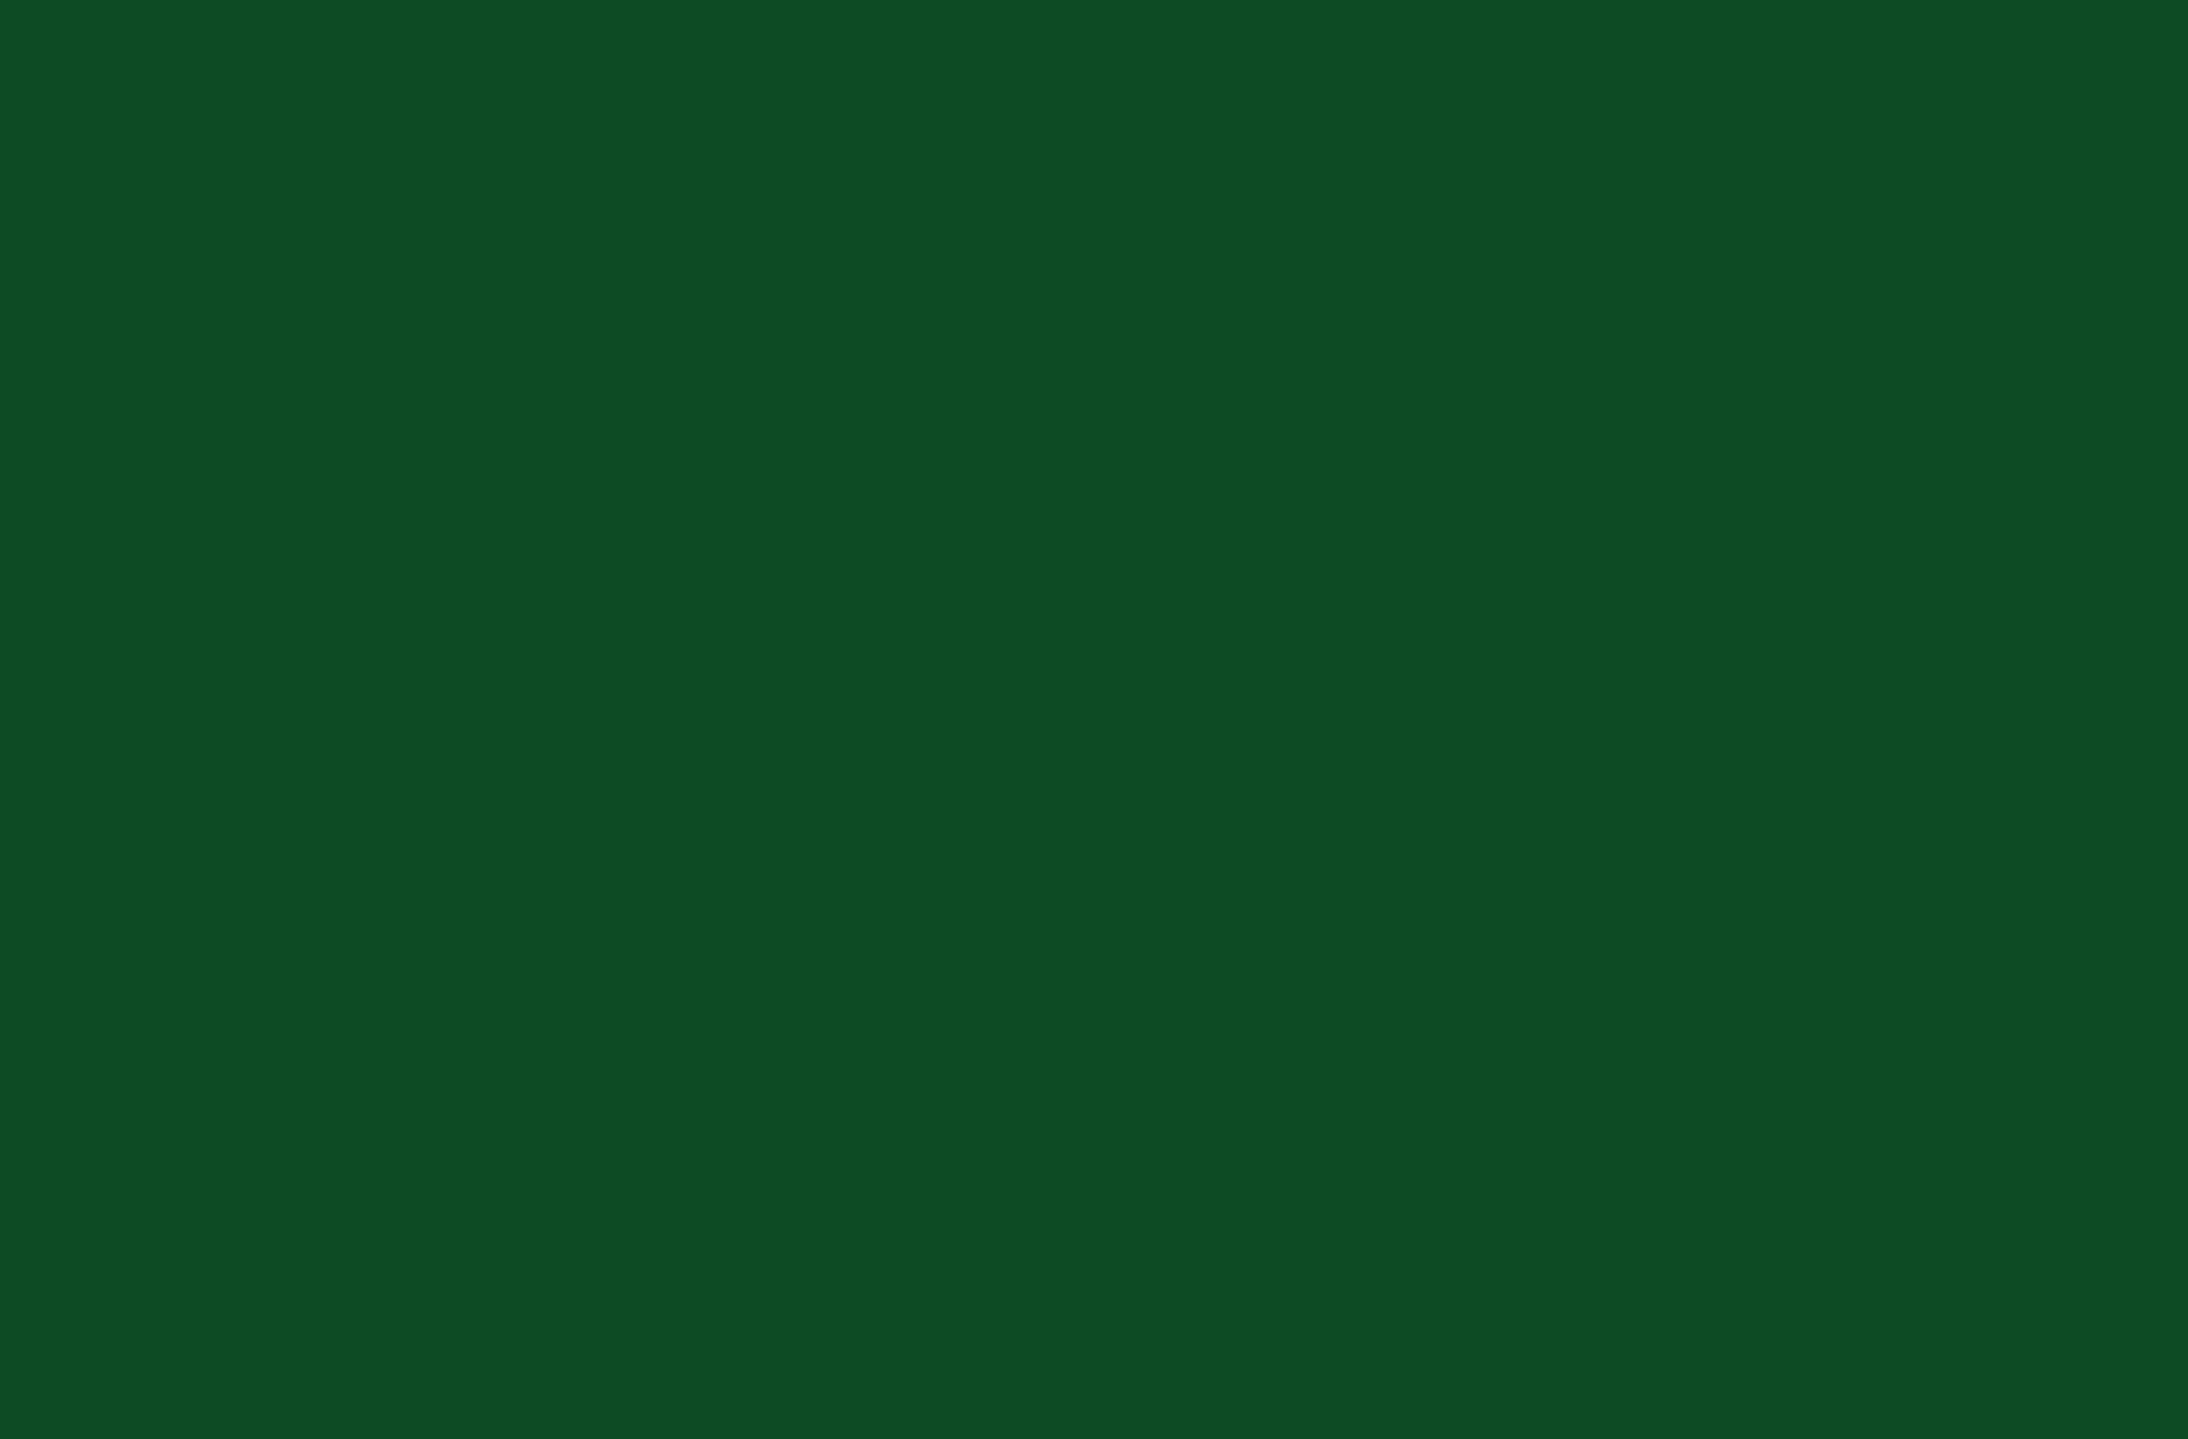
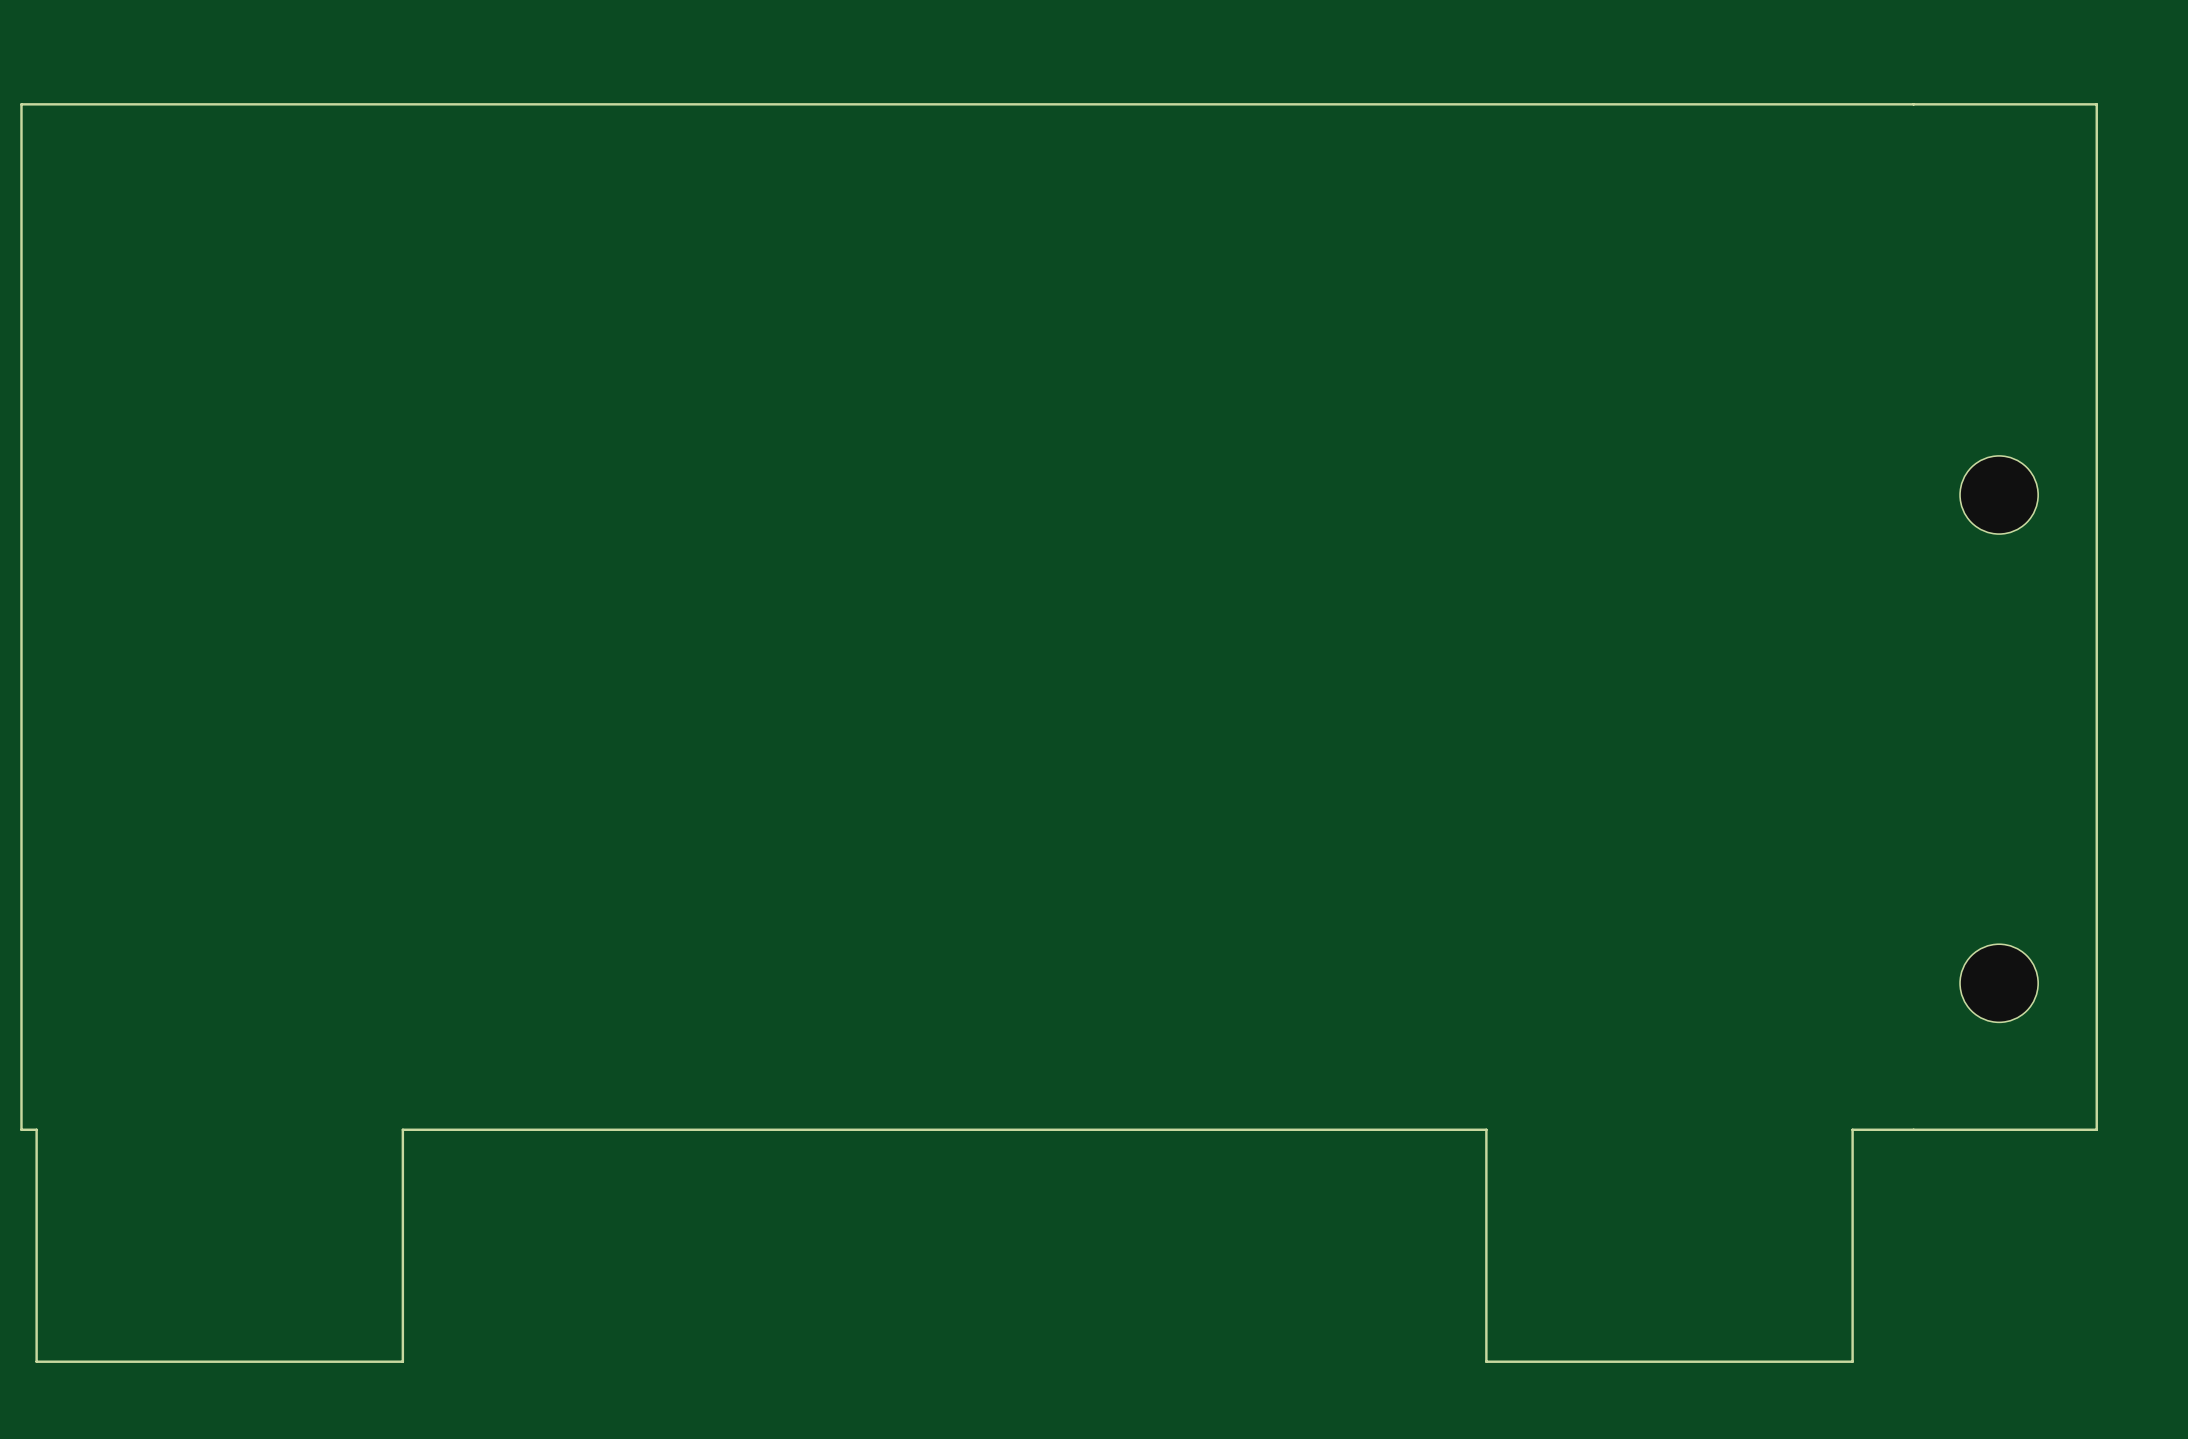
board edge: none -> (2096, 104) (2096, 1129) (1852, 1129) (1852, 1361) (1486, 1361) (1486, 1129) (402, 1129) (402, 1361) (36, 1361) (36, 1129) (21, 1129) (21, 104) (2096, 104)
part: none -> (1999, 494)
part: none -> (1999, 983)

